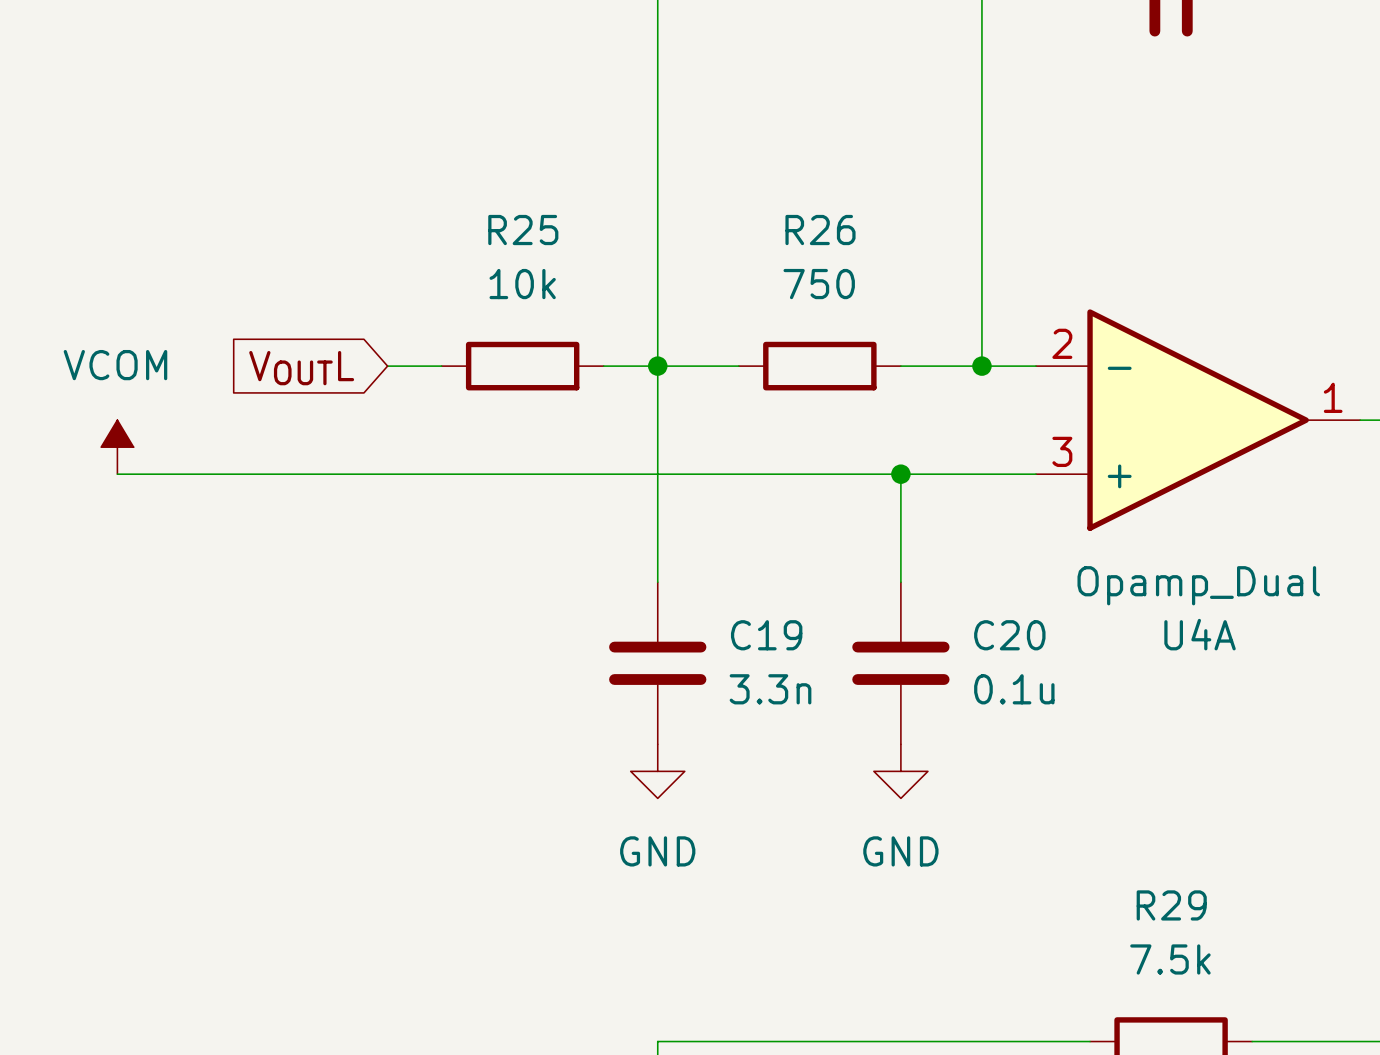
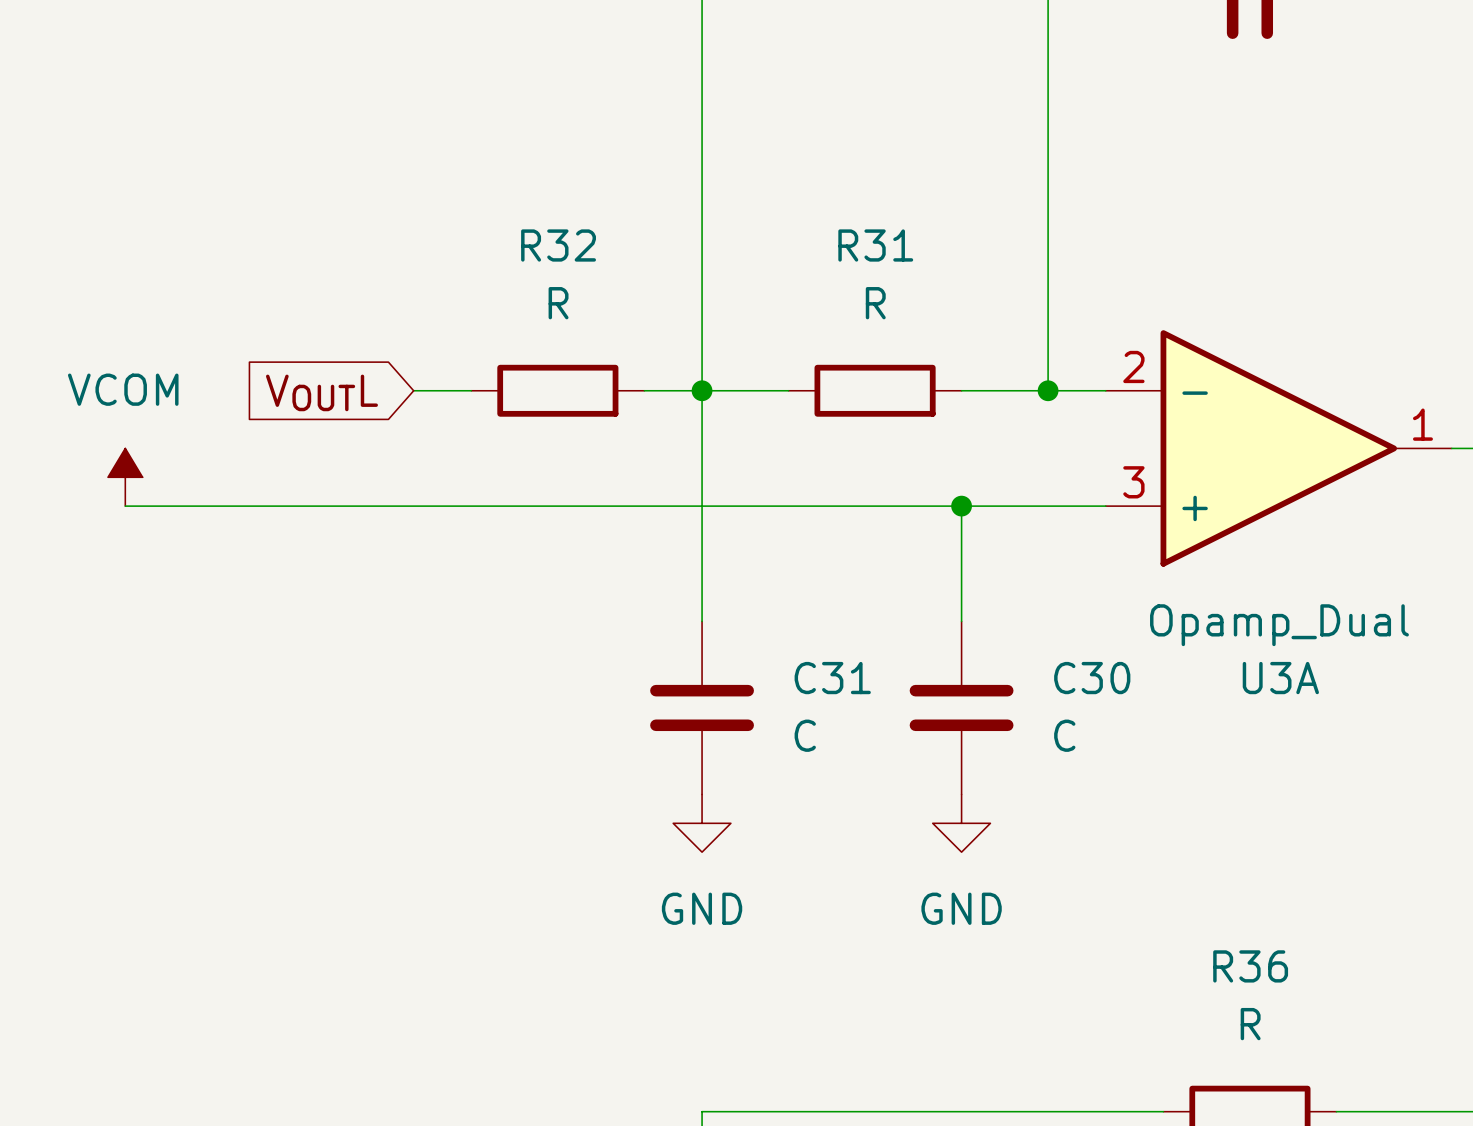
R25 name: R25 (523, 230) -> R32 (558, 245)
R26 name: R26 (820, 230) -> R31 (875, 245)
R25 value: 10k (522, 284) -> R (558, 303)
R26 value: 750 (819, 284) -> R (875, 303)
U4A name: U4A (1200, 634) -> U3A (1280, 678)
C19 name: C19 (766, 635) -> C31 (832, 678)
C20 name: C20 (1009, 635) -> C30 (1092, 678)
C19 value: 3.3n (770, 689) -> C (805, 735)
C20 value: 0.1u (1014, 689) -> C (1064, 735)
R29 name: R29 (1171, 905) -> R36 (1250, 966)
R29 value: 7.5k (1170, 959) -> R (1250, 1024)

